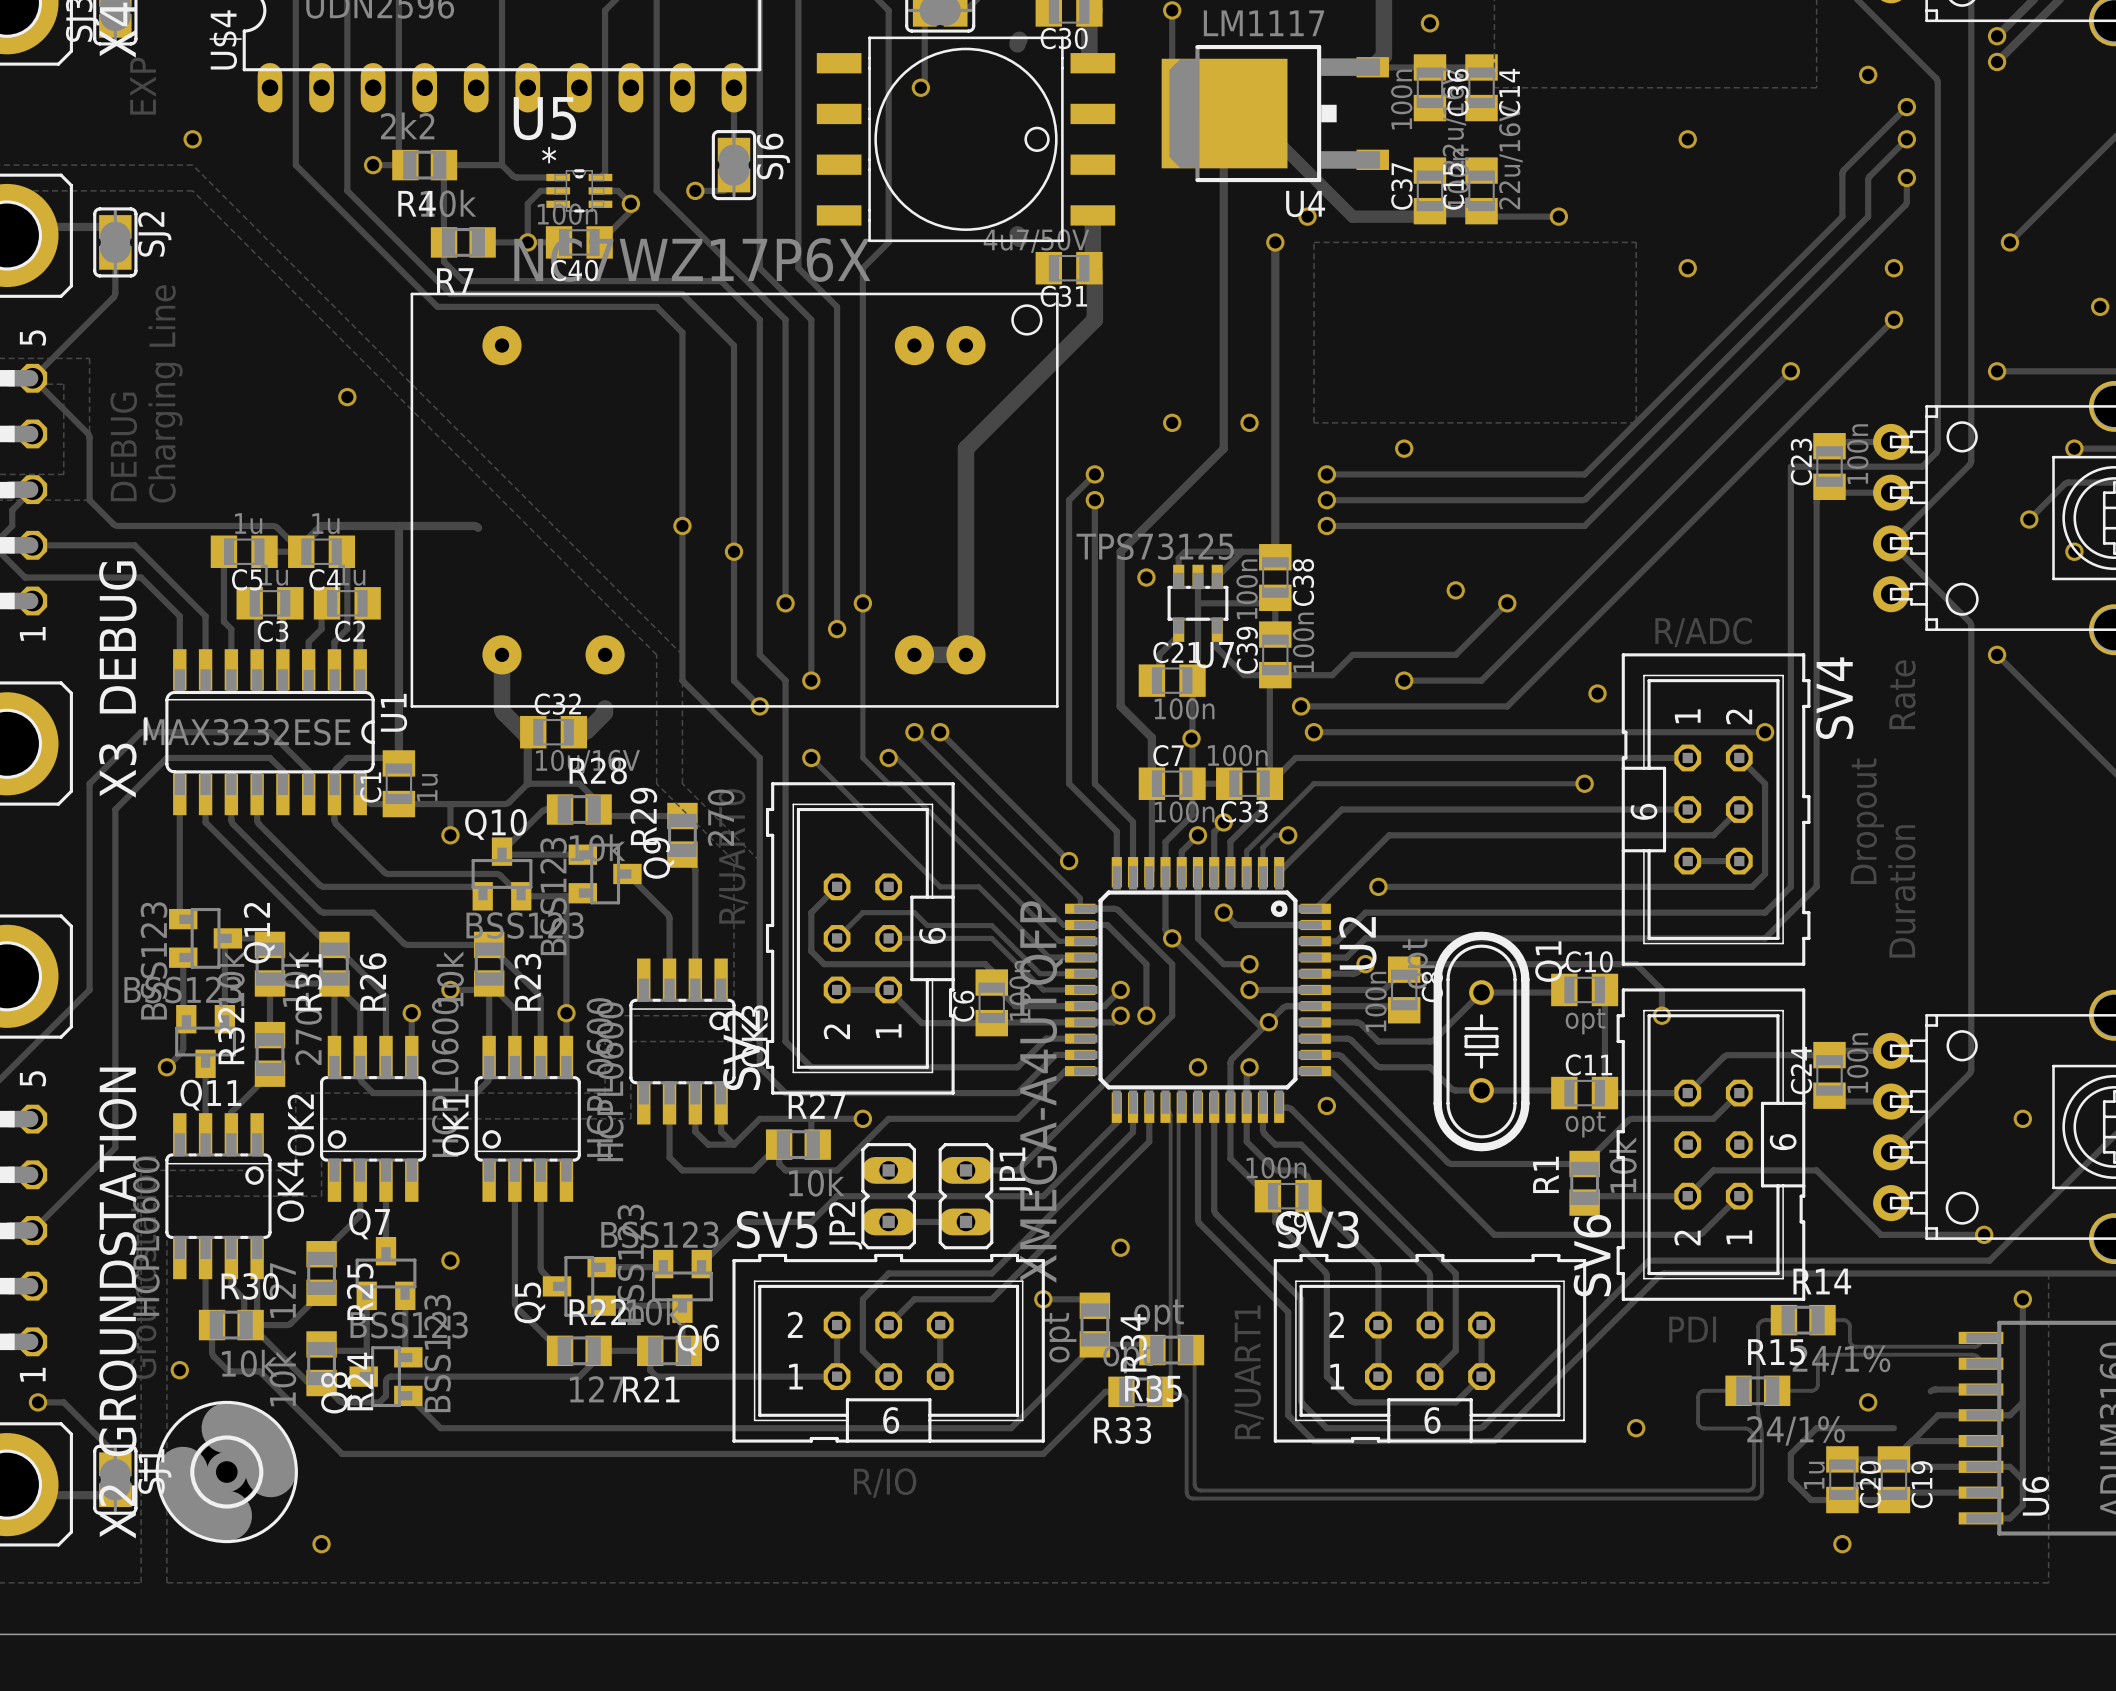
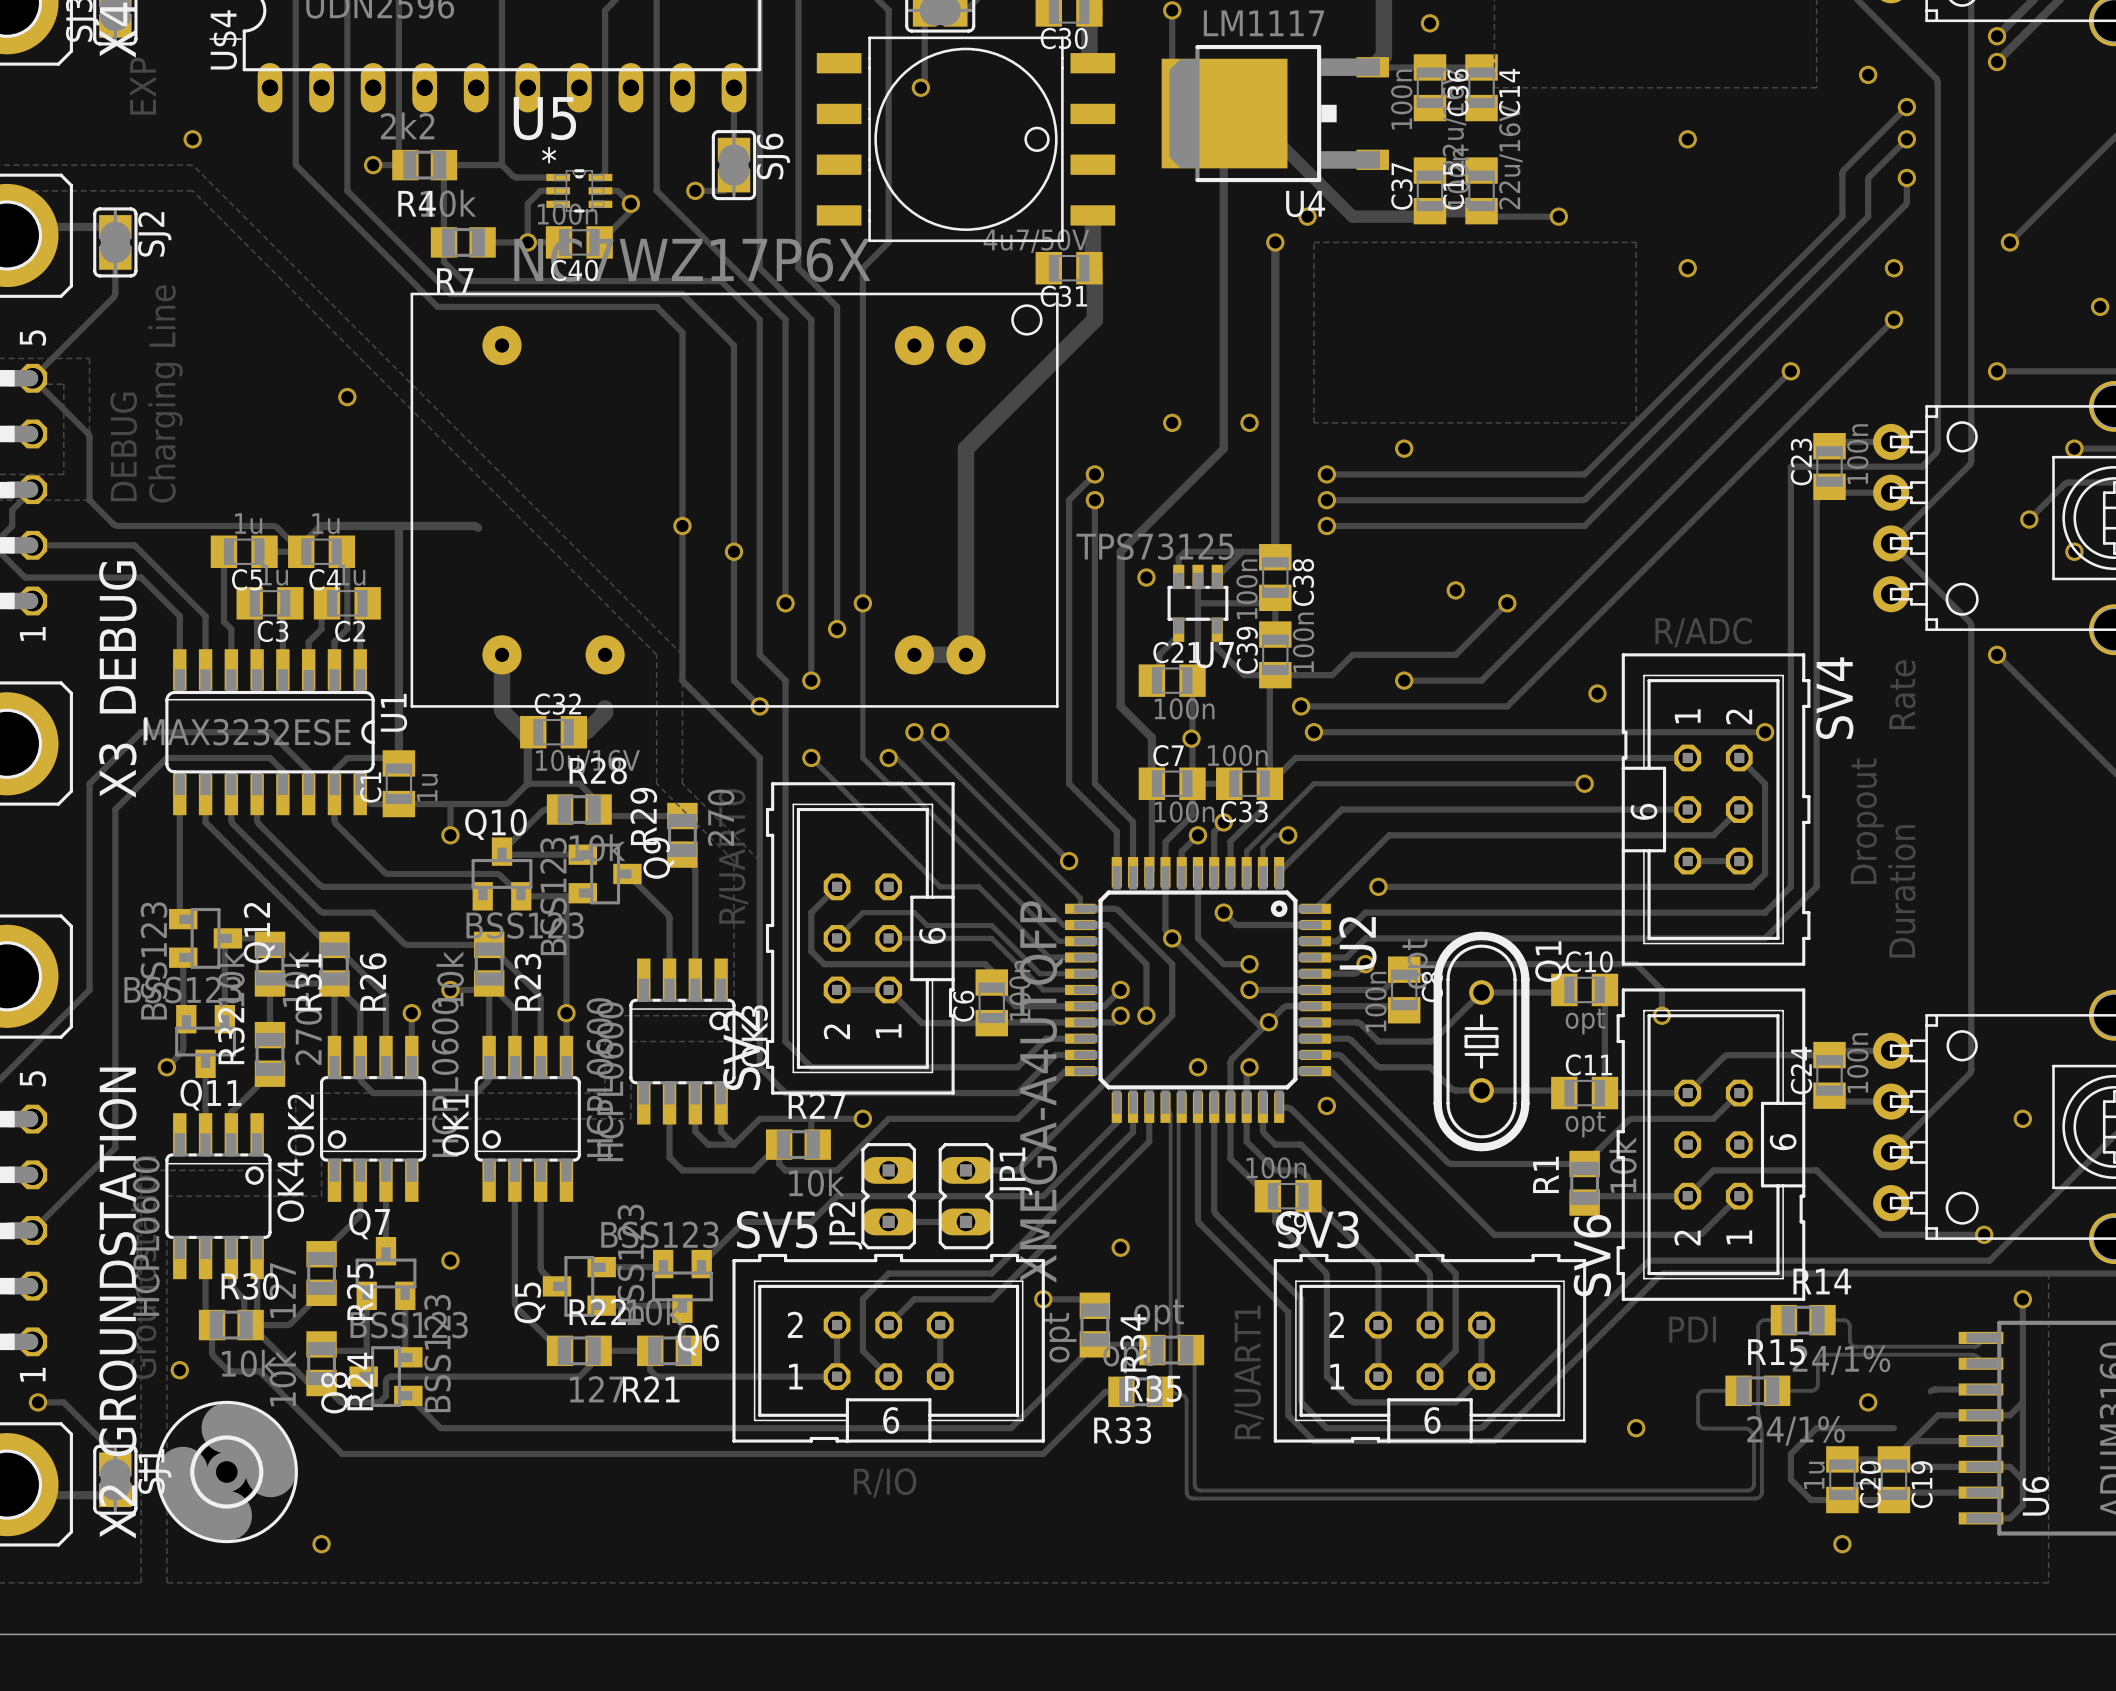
track: (1019, 39) (1017, 44) -> none
track: (1017, 234) (1019, 238) -> none

